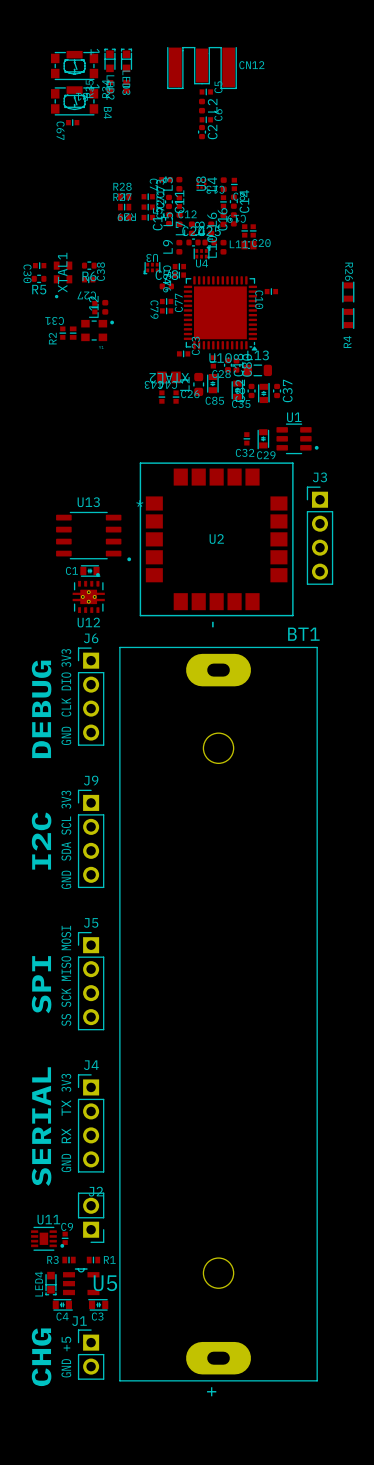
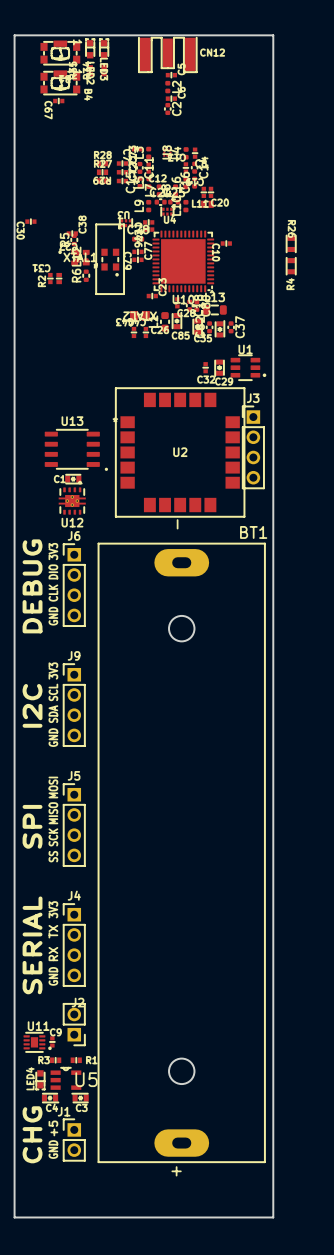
board edge: none -> (14, 35) (273, 35) (273, 1217) (14, 1217) (14, 35)
R6 rotation: 0° (89, 265) -> 90° clockwise (86, 275)
R6 position: (89, 265) -> (86, 275)
line: none -> (96, 224) (124, 224) (124, 294) (96, 294) (96, 224)
R5 rotation: 0° (39, 278) -> 90° clockwise (74, 239)
R5 position: (39, 278) -> (74, 239)
XTAL1 rotation: 0° (63, 279) -> 90° clockwise (74, 257)
XTAL1 position: (63, 279) -> (74, 257)
part rotation: 0° (97, 330) -> 90° clockwise (110, 262)
part position: (97, 330) -> (110, 262)
J3 position: (320, 535) -> (253, 447)

